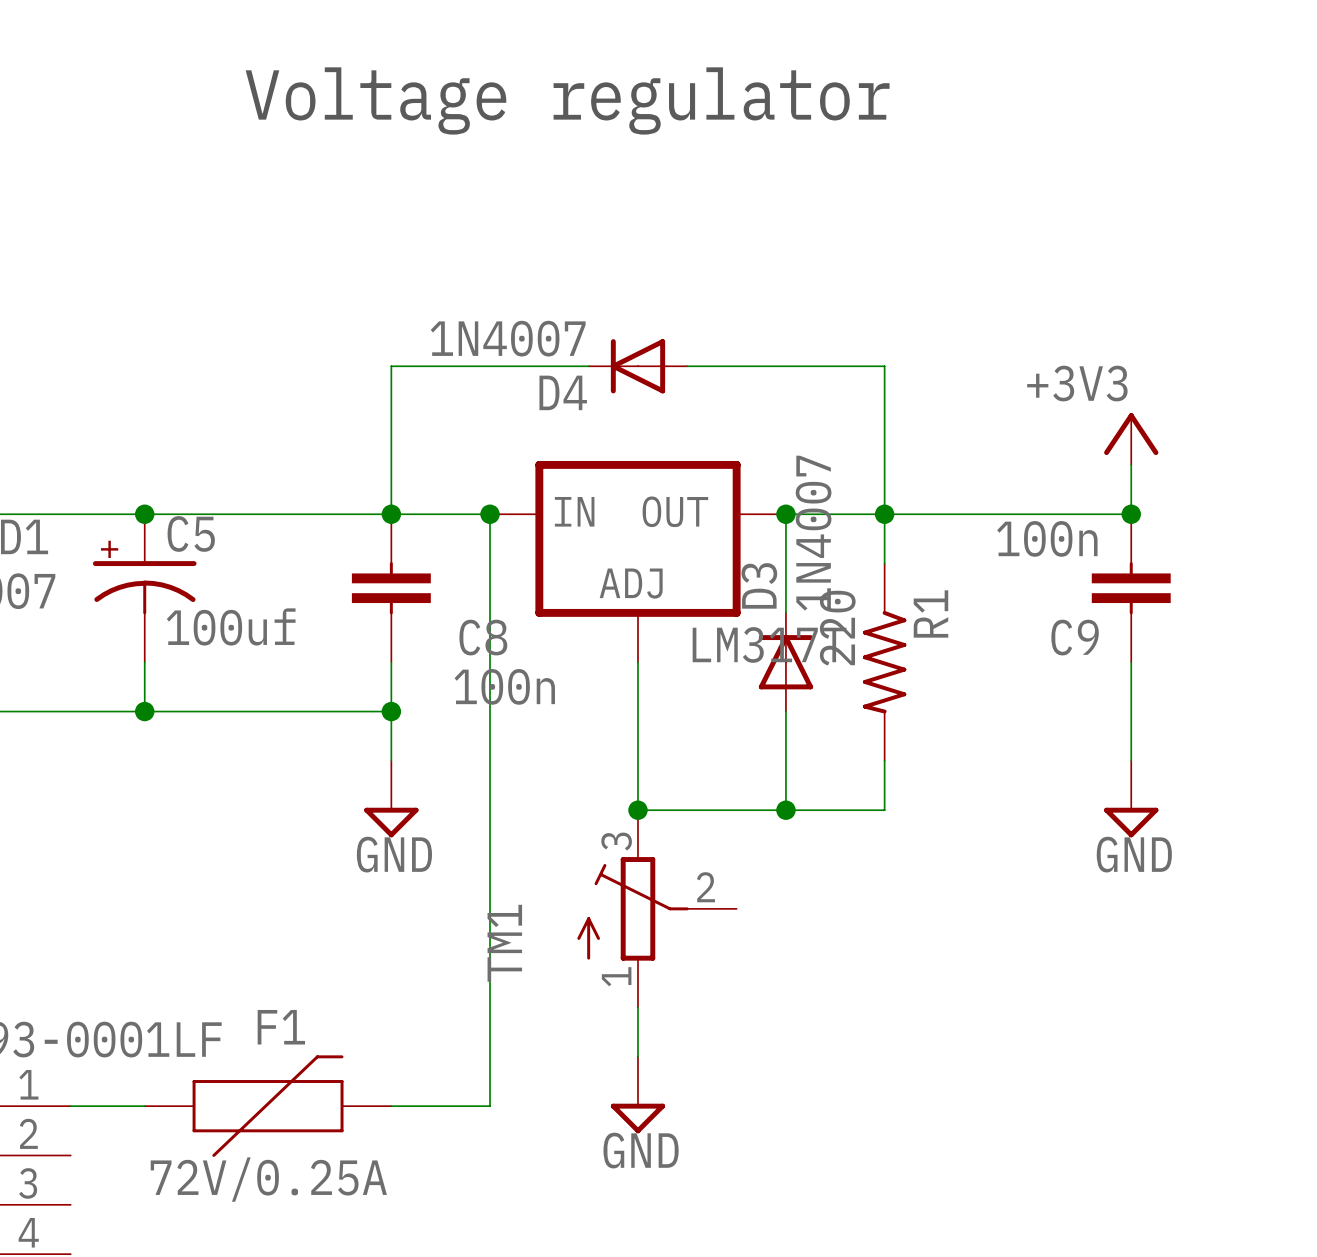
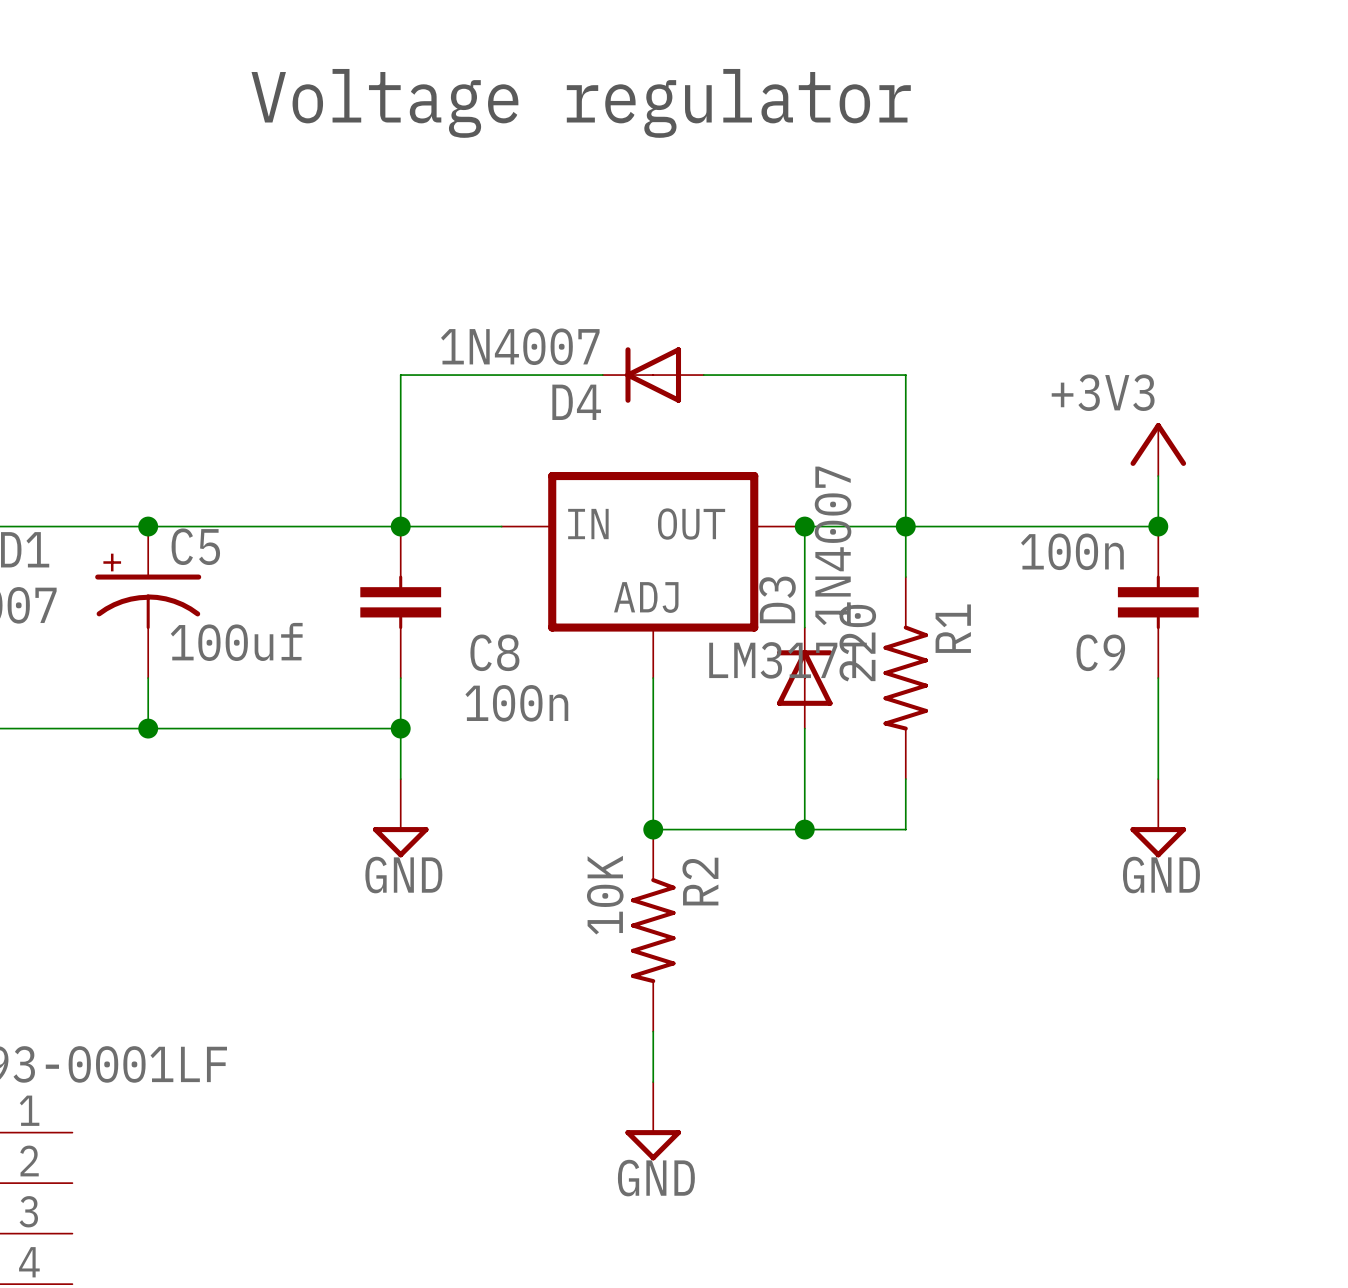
wire: (490, 514) (490, 1106) (391, 1106) -> none
junction: (490, 514) -> none
R2: none -> 10K (653, 930)
TM1: (656, 908) -> none
wire: (70, 1106) (144, 1106) -> none
F1: 72V/0.25A (268, 1106) -> none

